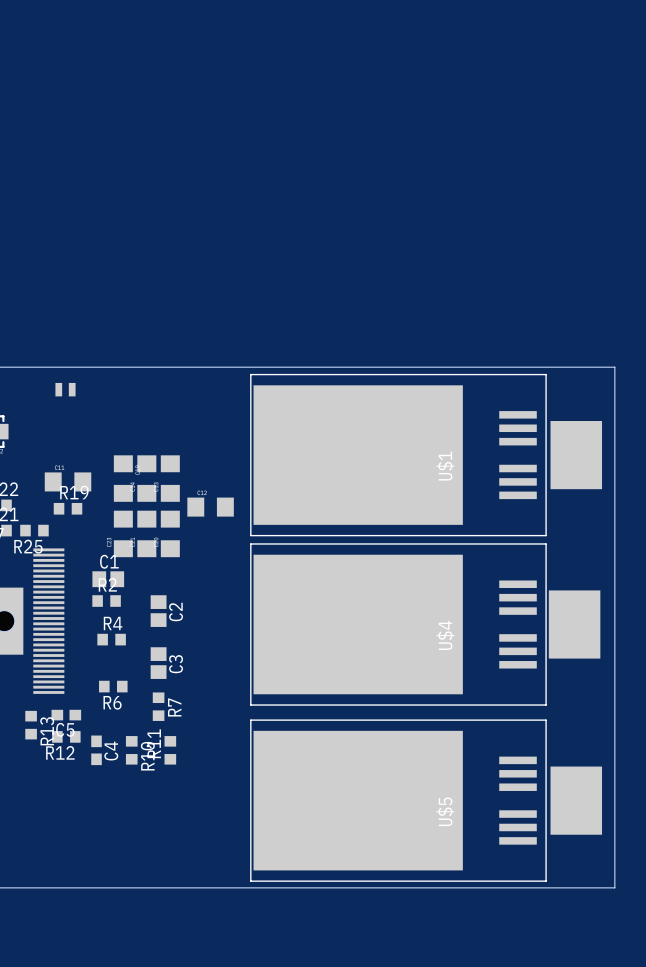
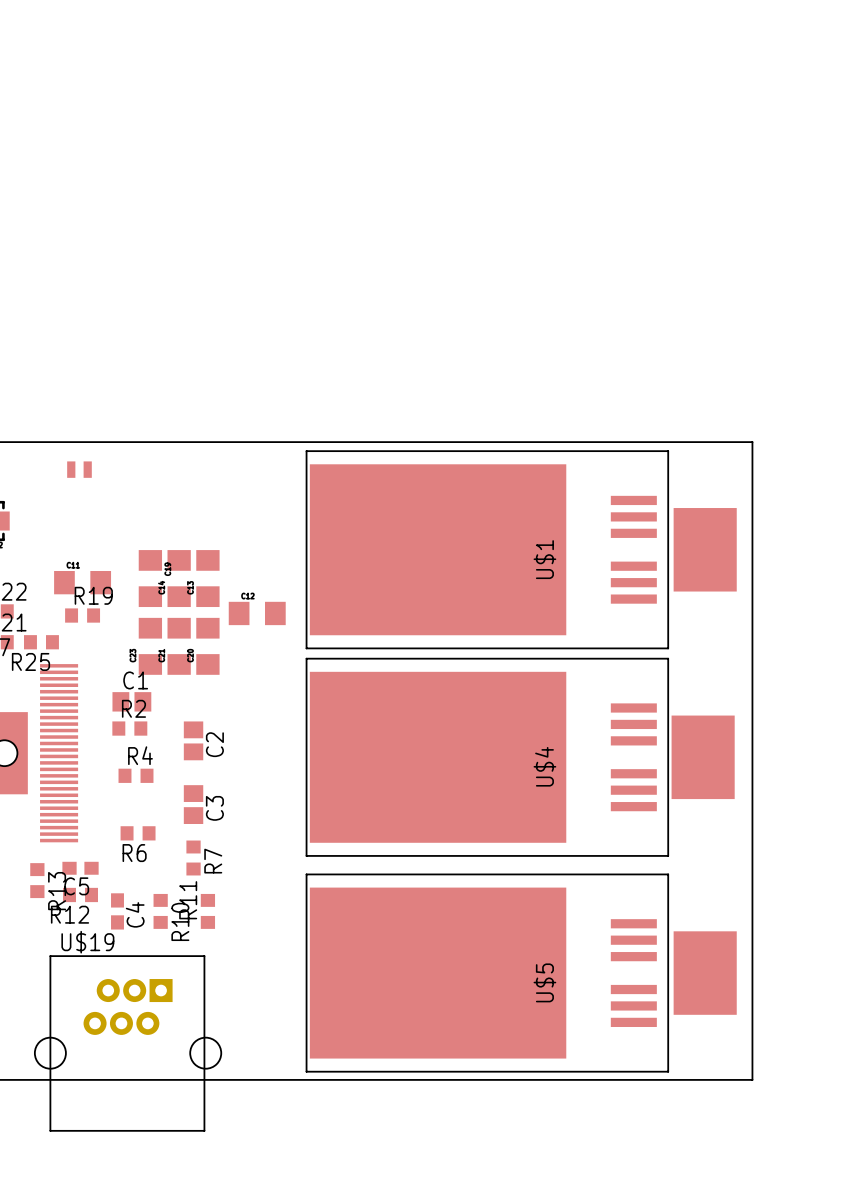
U$19: none -> (128, 1043)

